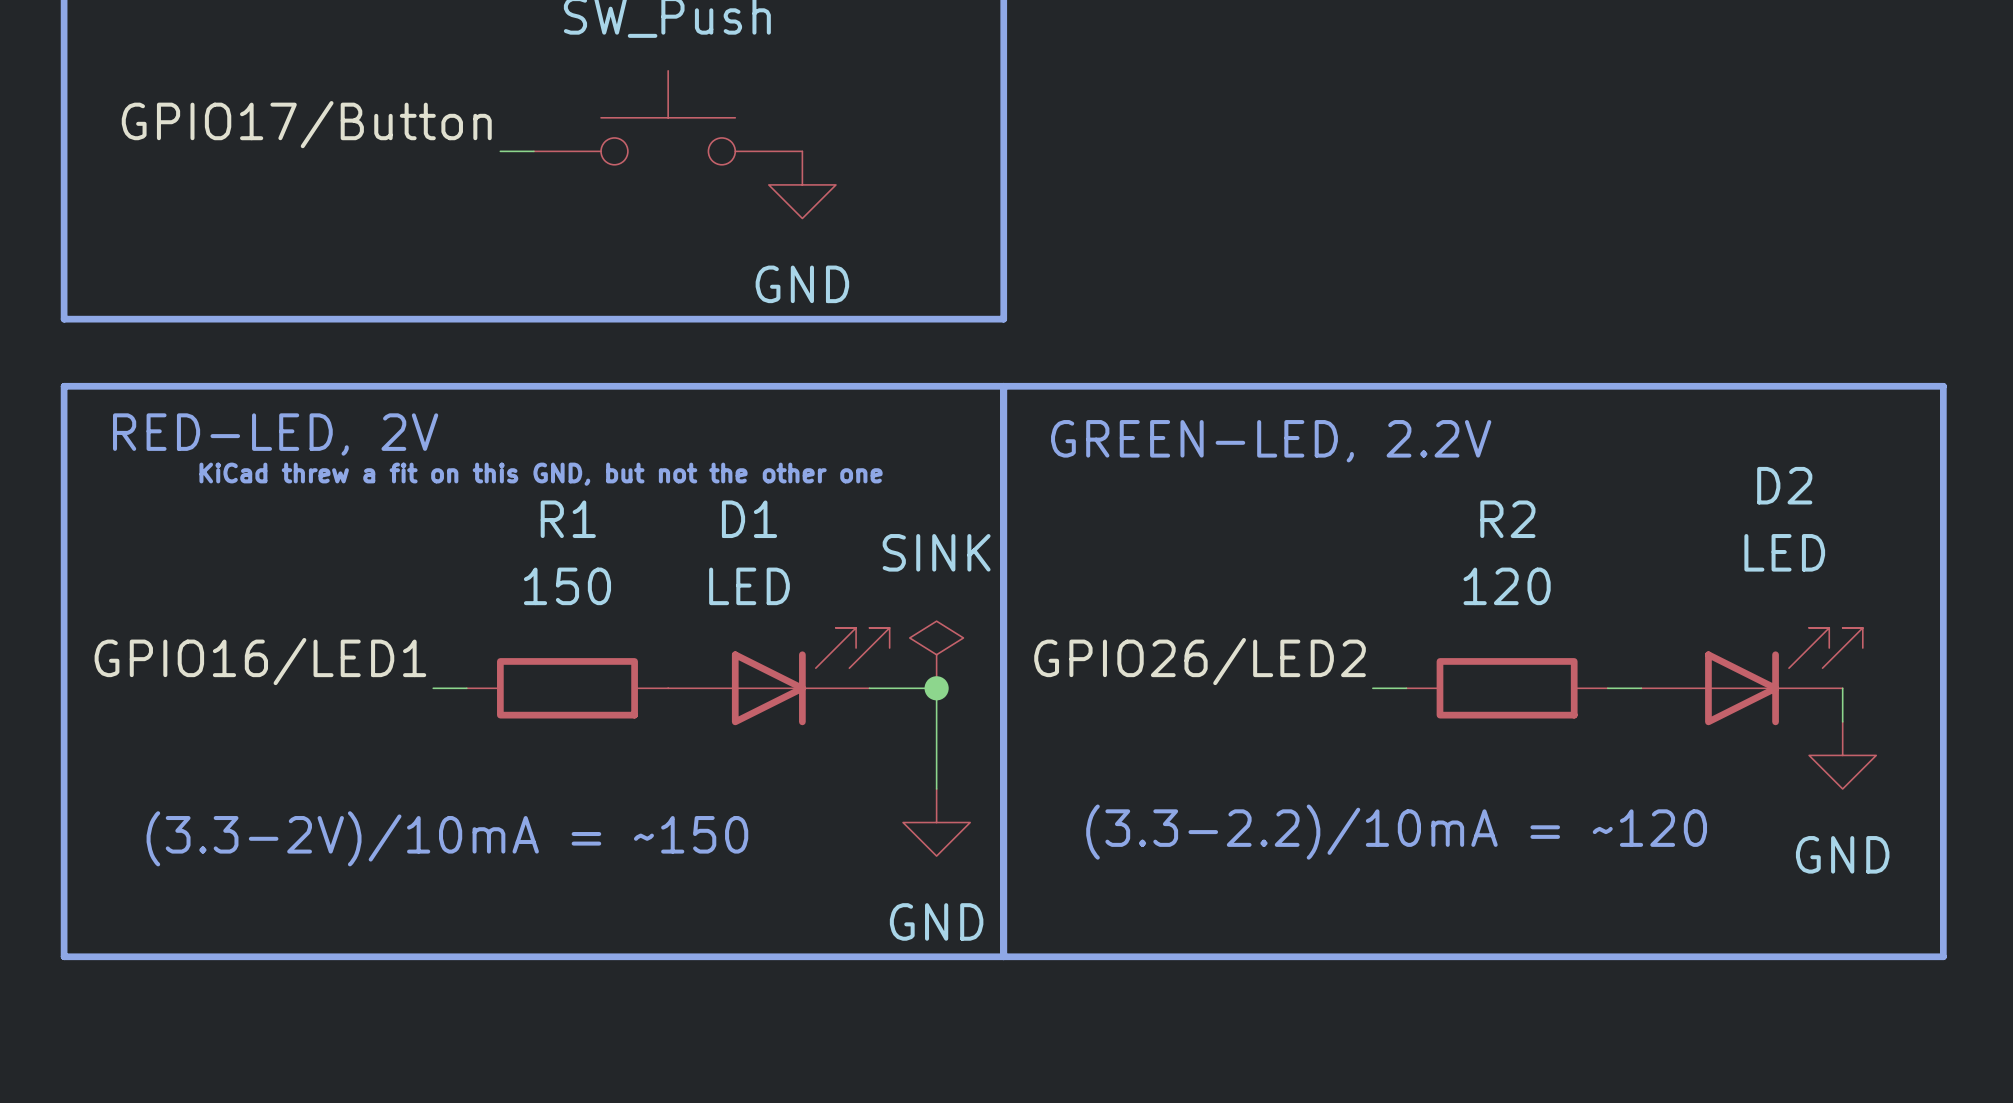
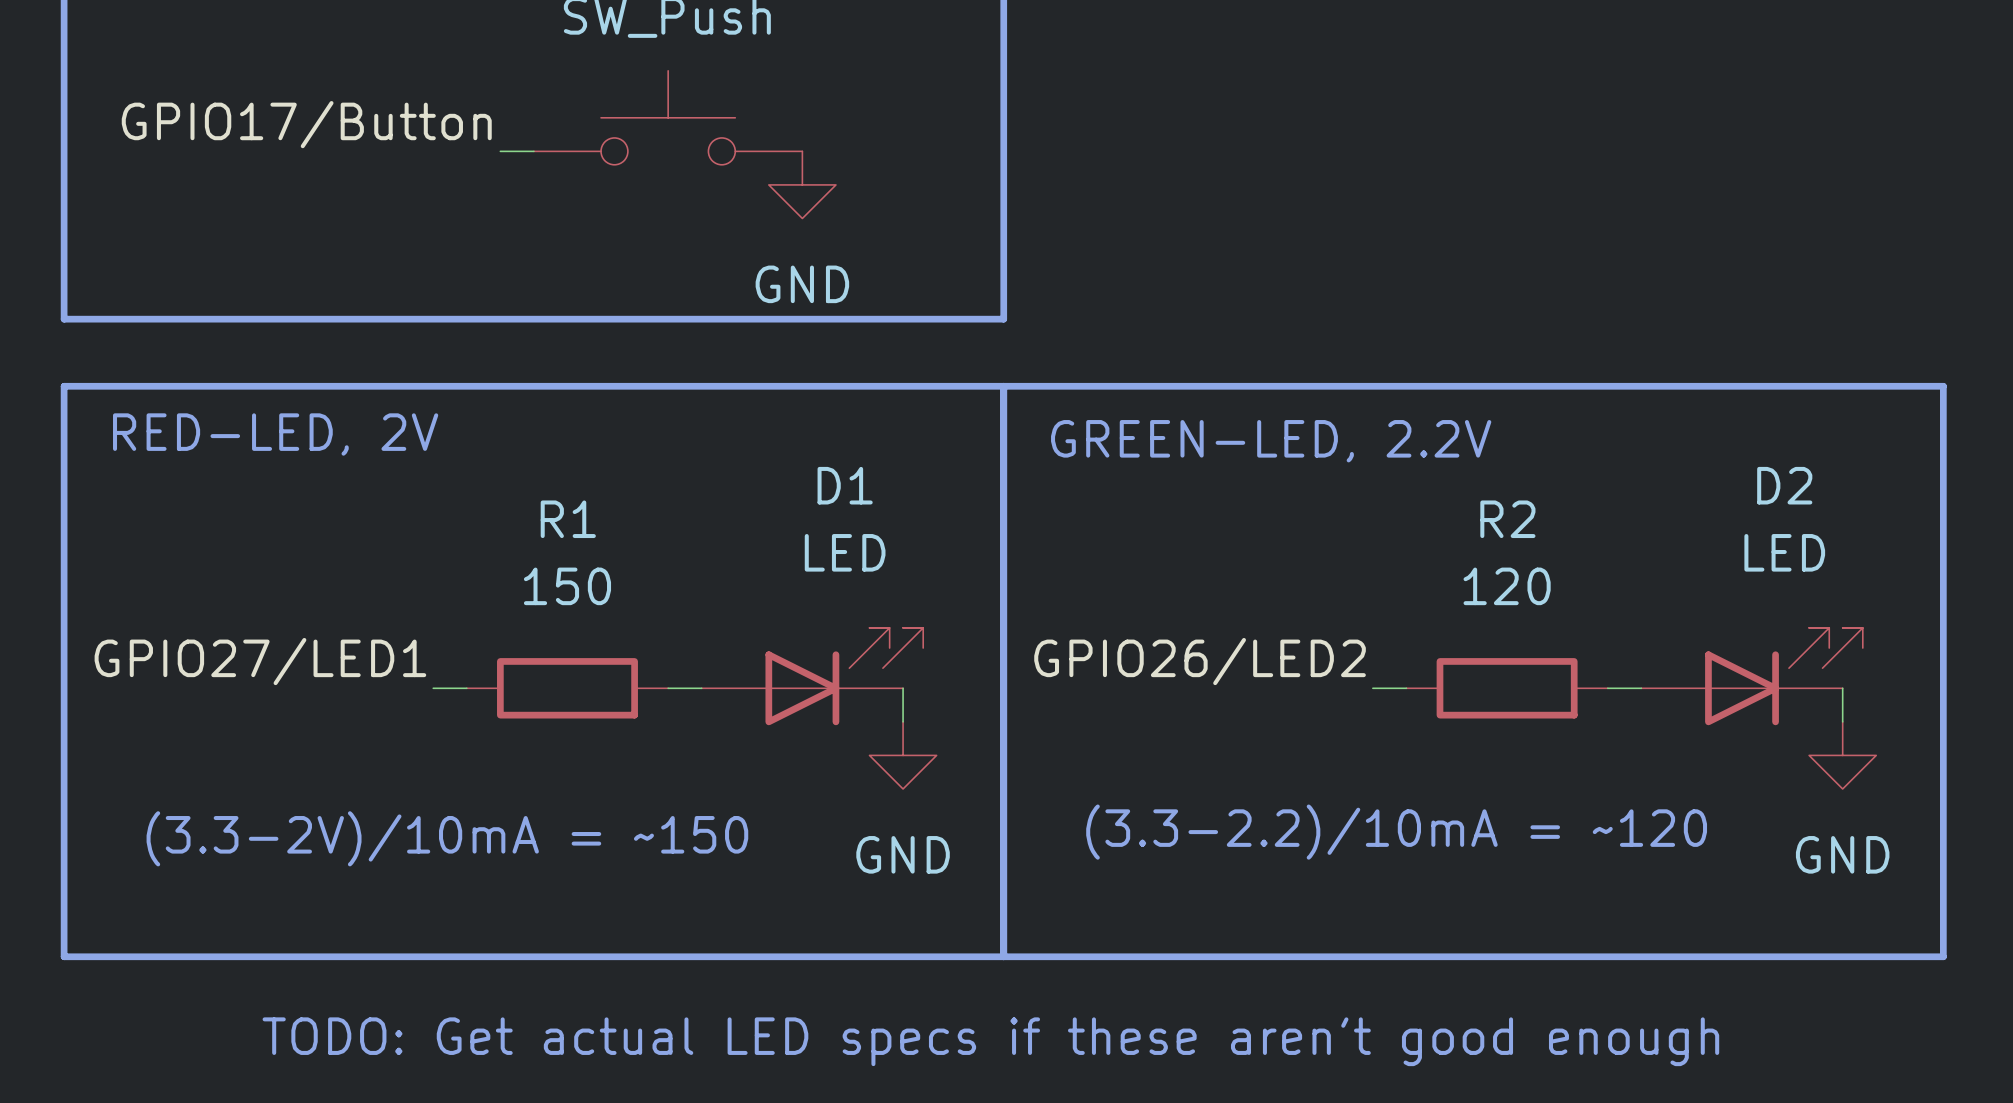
text: KiCad threw a fit on this GND, but not the other one (541, 474) -> none
D1 name position: D1 (749, 519) -> D1 (845, 485)
D1 value position: LED (749, 586) -> LED (845, 552)
power symbol: SINK (936, 654) -> none
label: GPIO16/LED1 (260, 661) -> GPIO27/LED1 (260, 661)
D1 position: (778, 676) -> (812, 676)
wire: (869, 688) (936, 688) (936, 788) -> none
wire: none -> (903, 688) (903, 721)
junction: (936, 688) -> none
power symbol position: GND (936, 822) -> GND (903, 755)
text: none -> TODO: Get actual LED specs if these aren't good enough (990, 1041)

